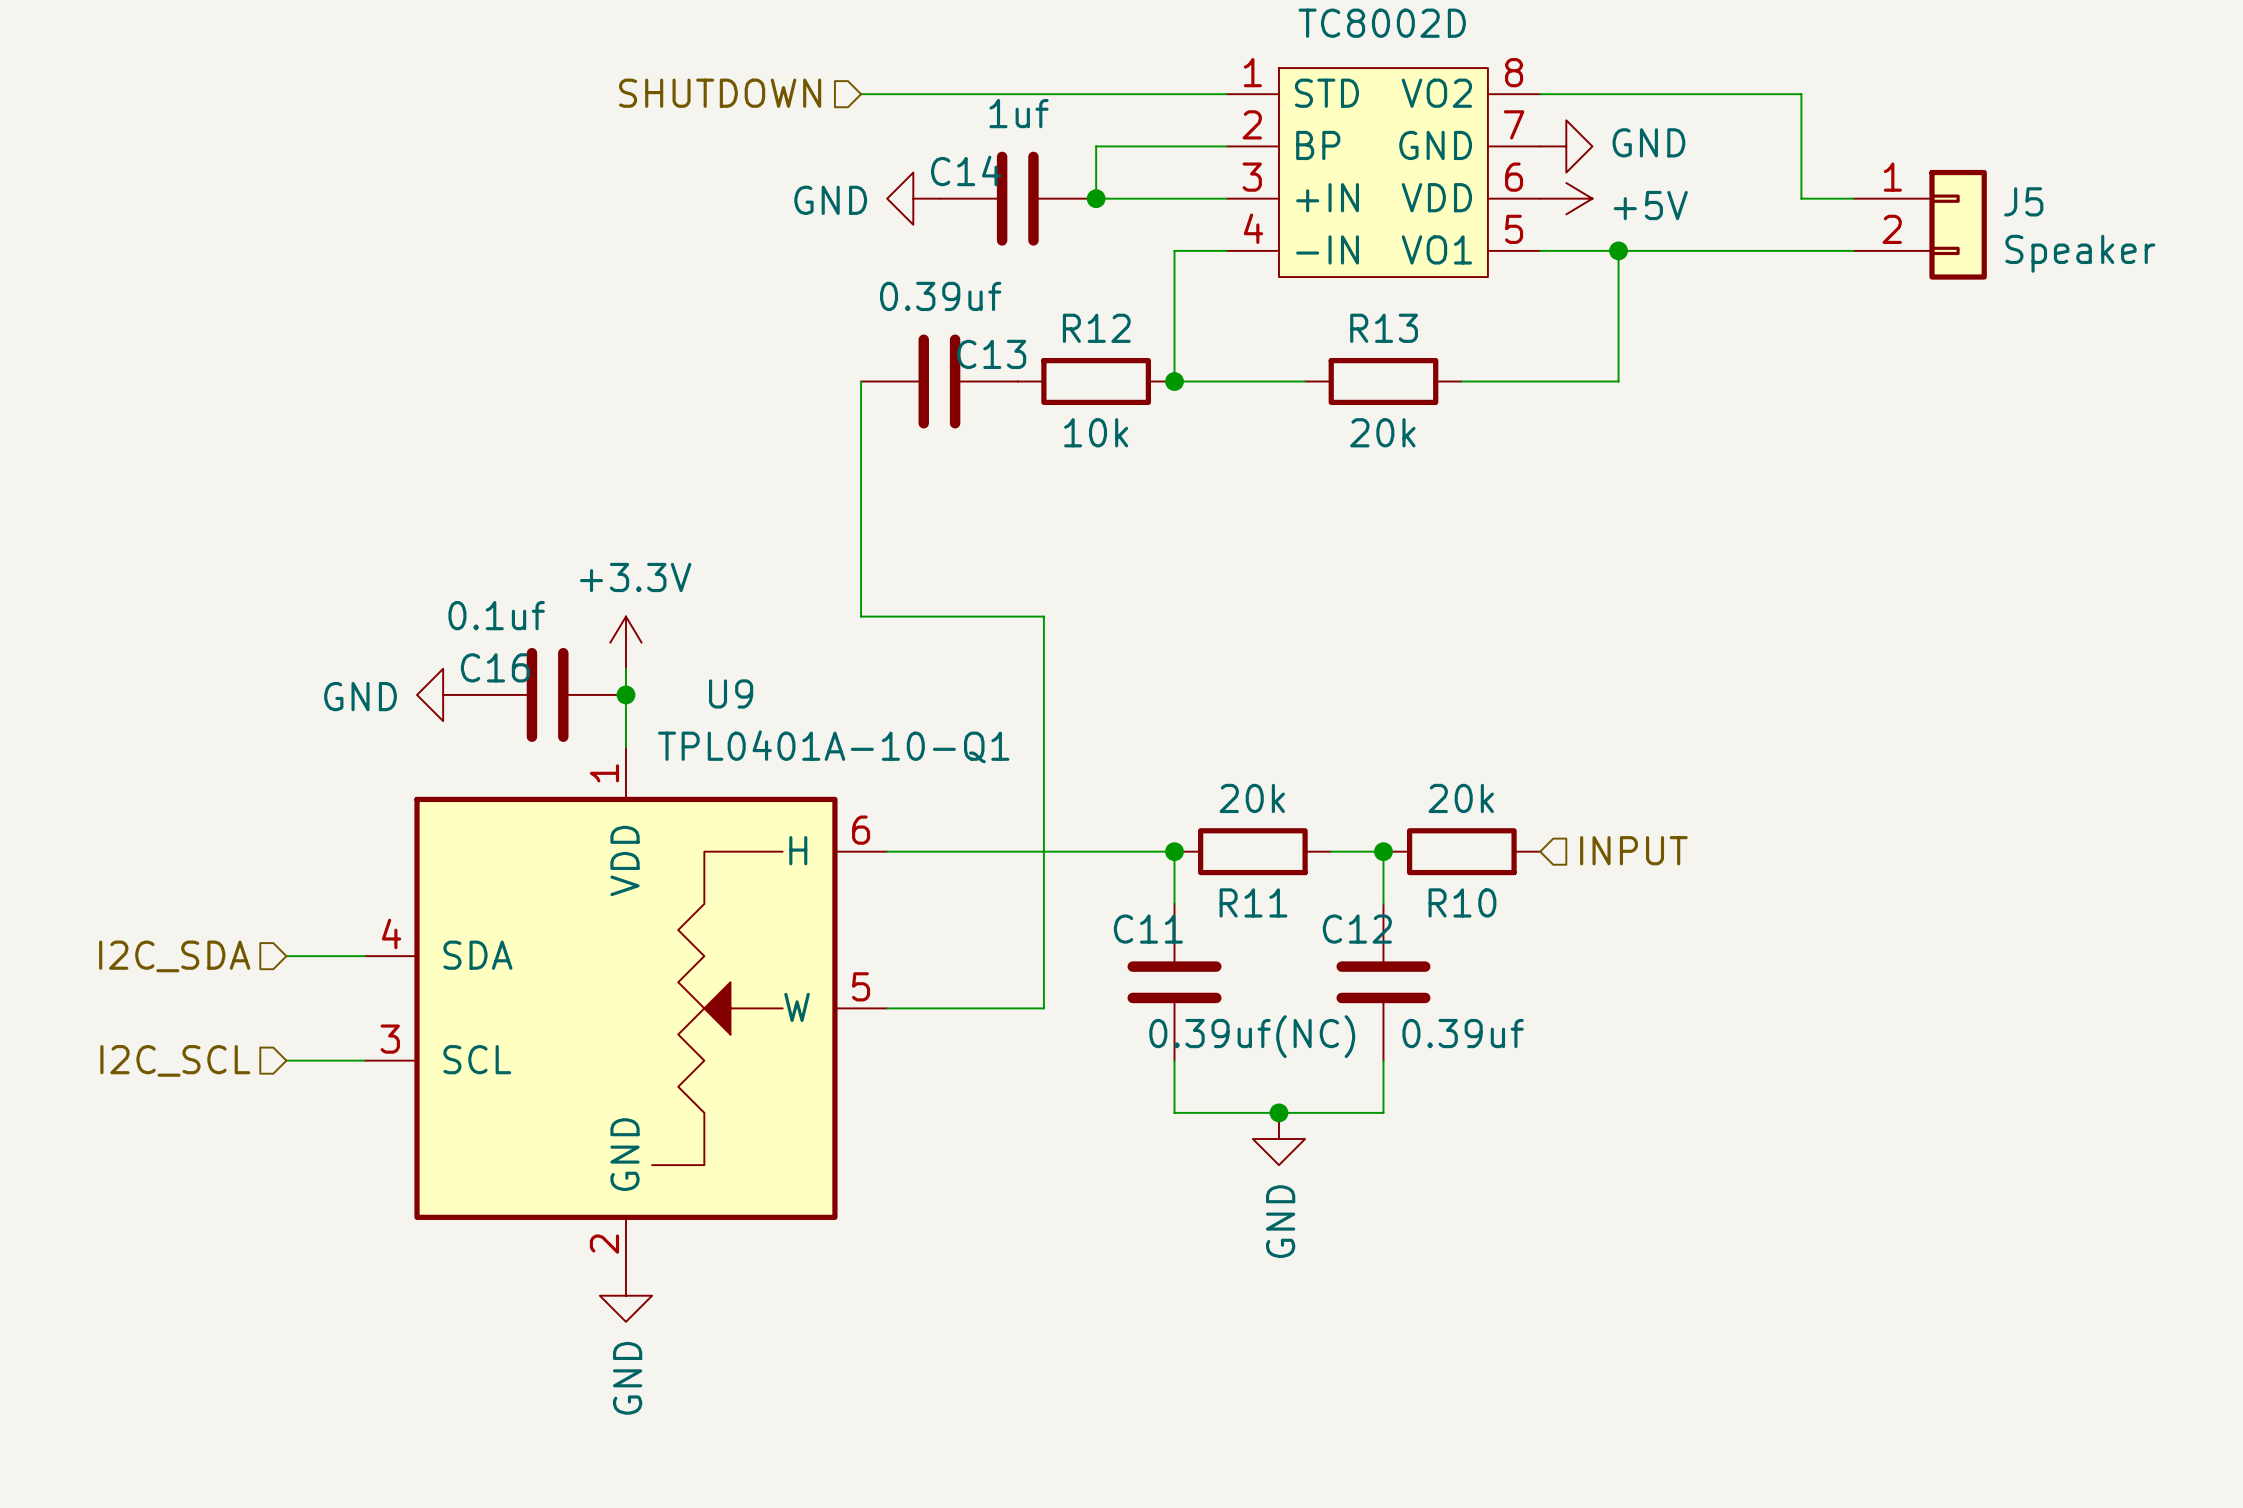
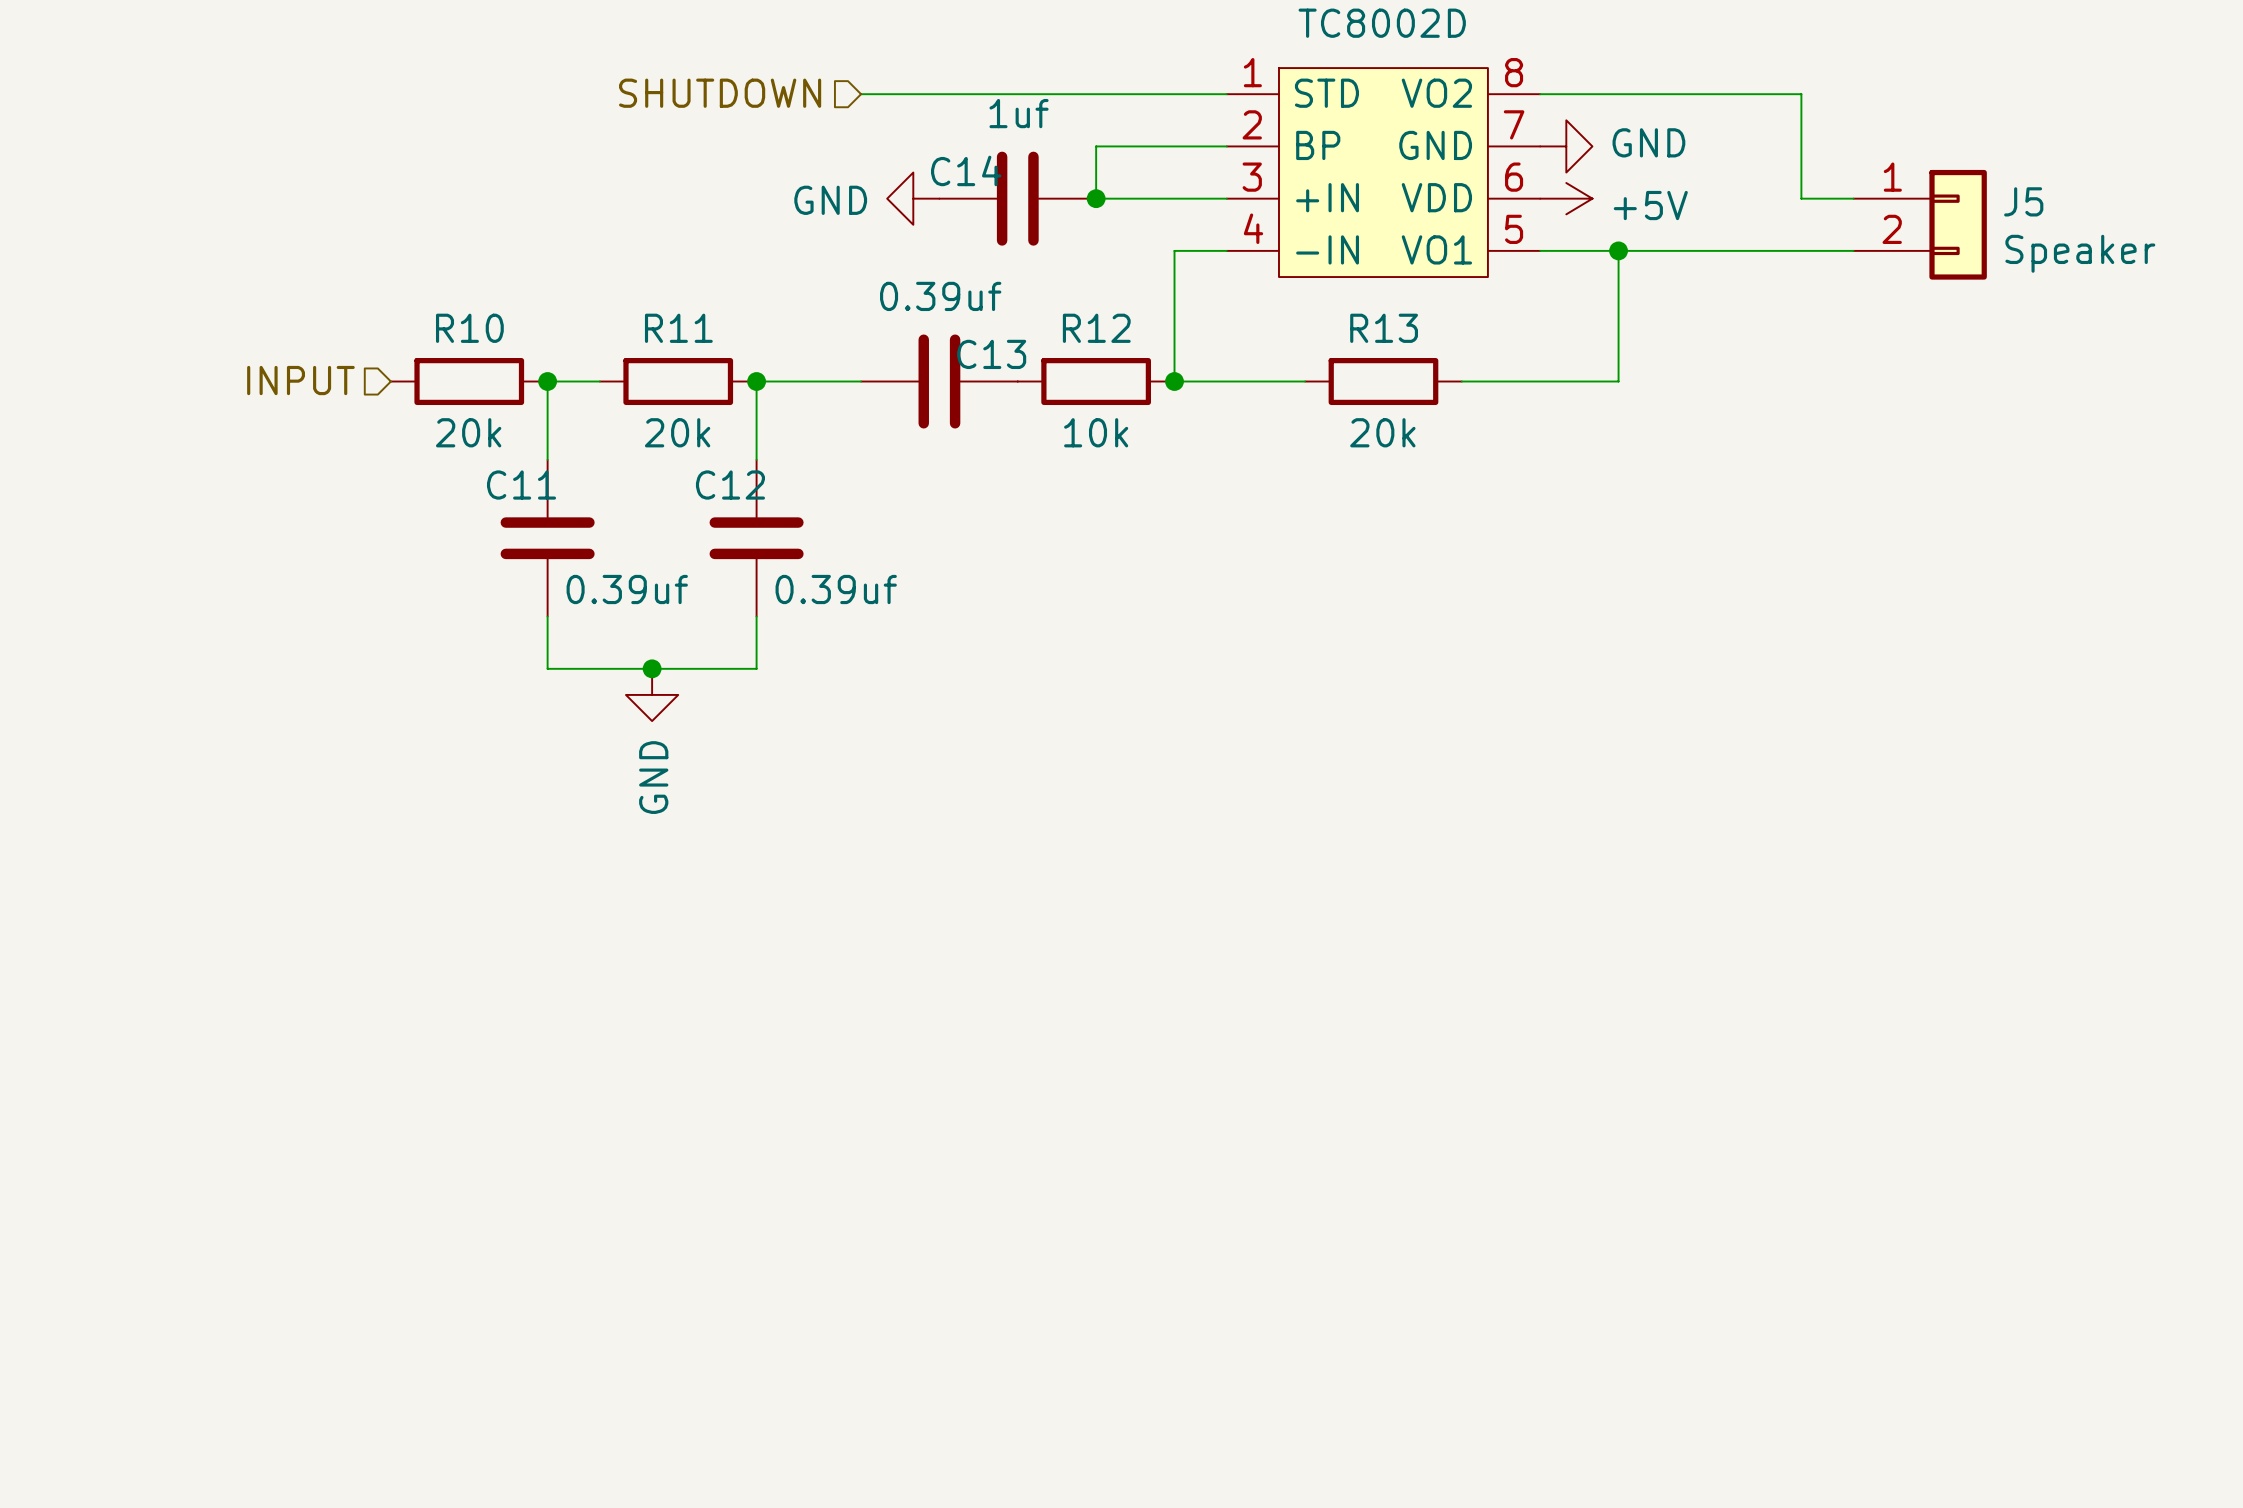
hierarchical label: none -> INPUT (300, 380)
junction: none -> (547, 381)
wire: none -> (599, 381) (547, 381) (547, 459)
junction: none -> (756, 381)
wire: (861, 381) (861, 616) (1043, 616) (1043, 1008) (887, 1008) -> (861, 381) (756, 381) (756, 459)
wire: none -> (547, 616) (547, 668) (756, 668) (756, 616)
power symbol: +3.3V (625, 642) -> none
wire: (625, 668) (625, 747) -> none
power symbol rotation: 0° (443, 694) -> 90° counterclockwise (652, 694)
power symbol position: GND (443, 694) -> GND (652, 694)
C16: 0.1uf (547, 694) -> none
junction position: (625, 694) -> (652, 668)
R11 value position: 20k (1252, 798) -> 20k (677, 432)
R10 value position: 20k (1461, 798) -> 20k (468, 432)
hierarchical label: INPUT (1633, 850) -> none
wire: (887, 851) (1174, 851) (1174, 903) -> none
junction: (1174, 851) -> none
R11 position: (1252, 851) -> (678, 381)
wire: (1331, 851) (1383, 851) (1383, 903) -> none
junction: (1383, 851) -> none
R10 position: (1461, 851) -> (469, 381)
R11 name position: R11 (1253, 902) -> R11 (678, 328)
R10 name position: R10 (1462, 902) -> R10 (469, 328)
hierarchical label: I2C_SDA (174, 956) -> none
wire: (286, 956) (364, 956) -> none
C11 position: (1174, 982) -> (547, 538)
C12 position: (1383, 982) -> (756, 538)
U9: TPL0401A-10-Q1 (625, 1008) -> none
C11 value: 0.39uf(NC) (1252, 1036) -> 0.39uf (627, 589)
hierarchical label: I2C_SCL (175, 1060) -> none
wire: (286, 1060) (364, 1060) -> none
wire: (1174, 1060) (1174, 1112) (1383, 1112) (1383, 1060) -> none
junction: (1278, 1112) -> none
power symbol: GND (1278, 1138) -> none
power symbol: GND (625, 1295) -> none

